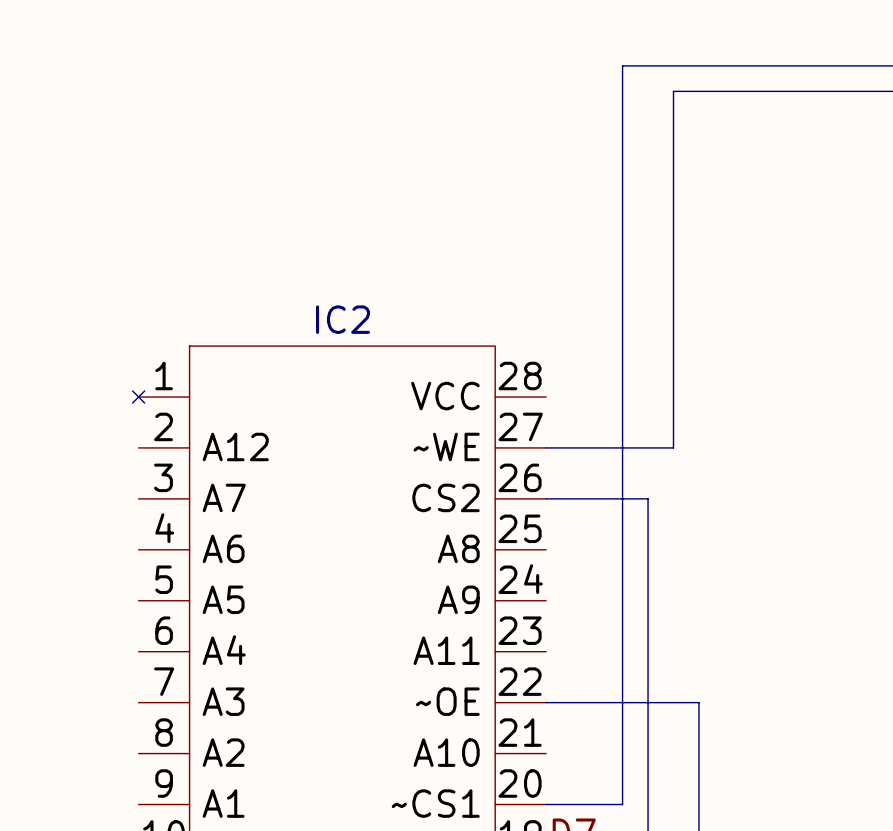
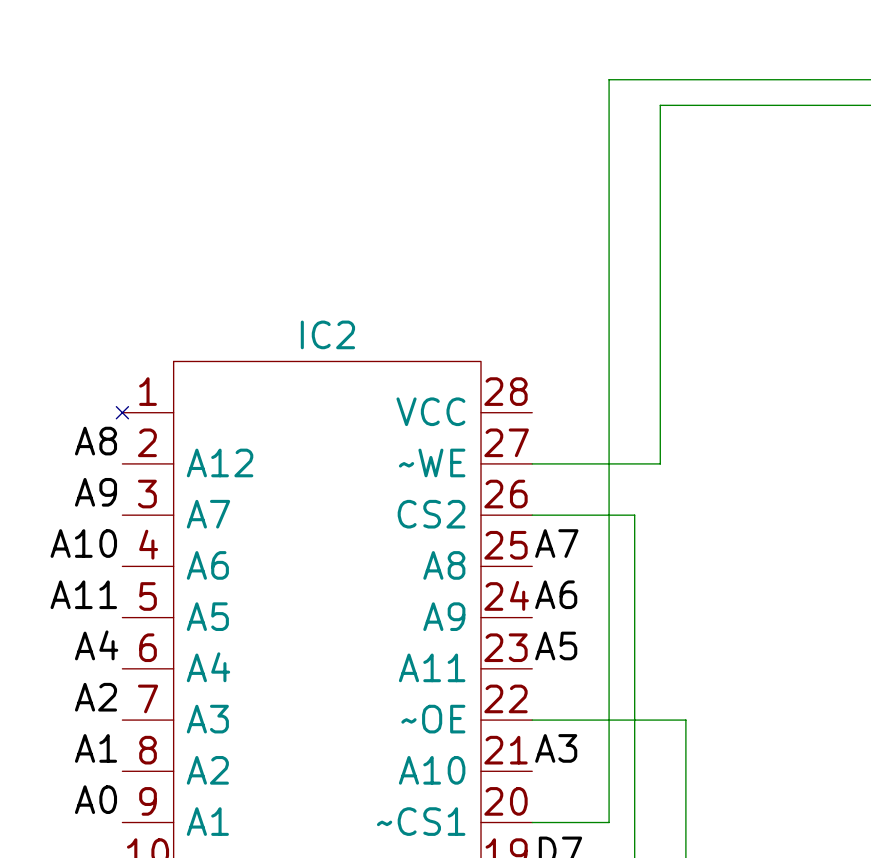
label: none -> A8 (95, 441)
label: none -> A9 (95, 492)
label: none -> A10 (83, 543)
label: none -> A7 (556, 543)
label: none -> A11 (83, 594)
label: none -> A6 (556, 594)
label: none -> A4 (96, 645)
label: none -> A5 (556, 645)
label: none -> A2 (95, 697)
label: none -> A1 (95, 748)
label: none -> A3 (556, 748)
label: none -> A0 (95, 799)

